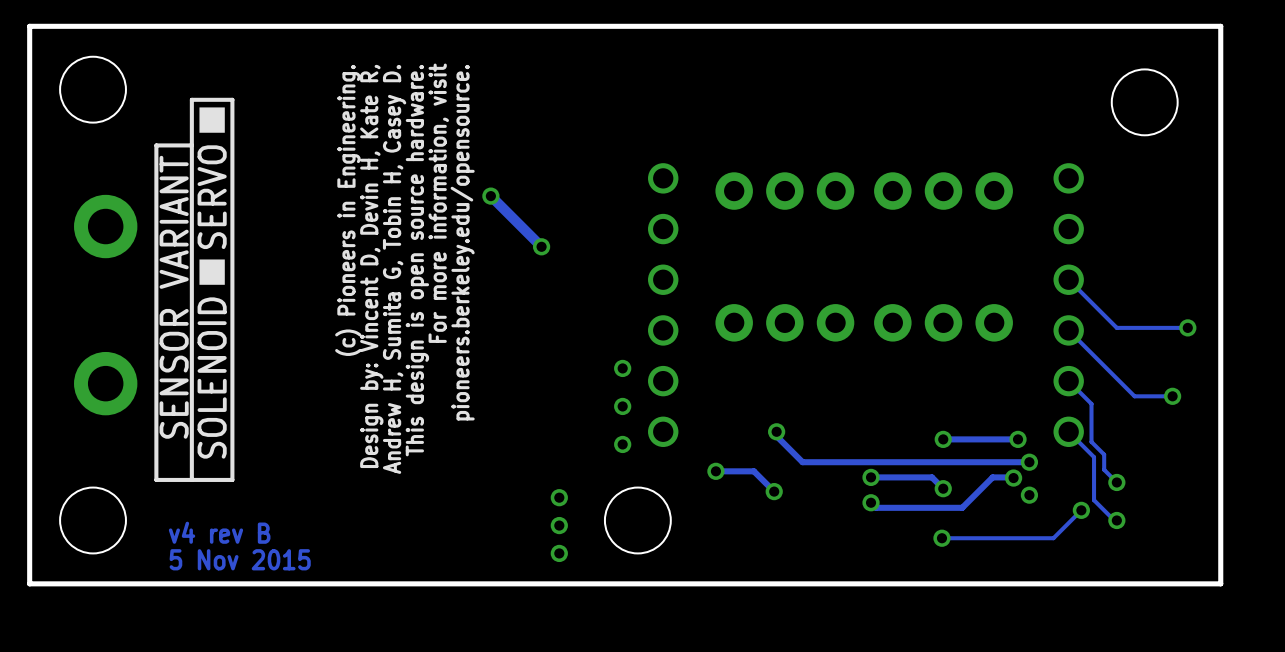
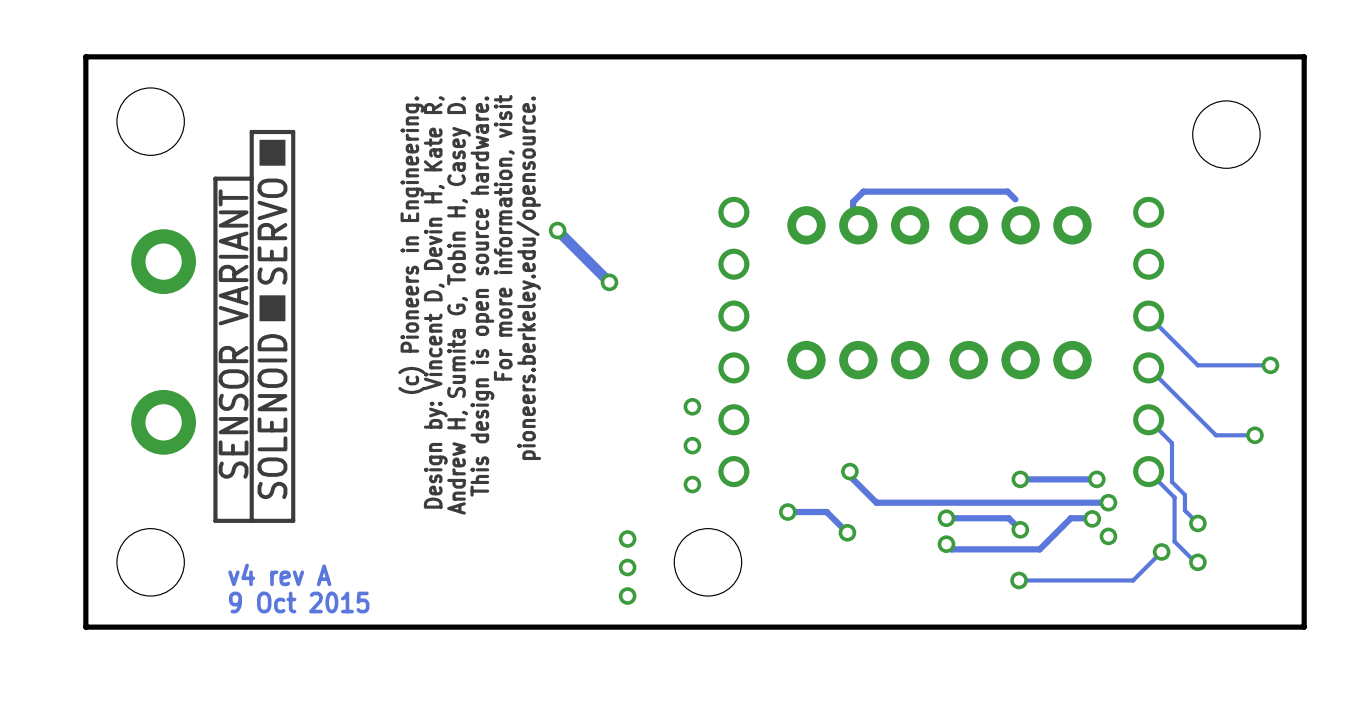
track: none -> (1015, 199) (1007, 191) (863, 191) (853, 202) (853, 225)
text: v4 rev B (219, 532) -> v4 rev A (279, 574)
text: 5 Nov 2015 (240, 559) -> 9 Oct 2015 (299, 602)

